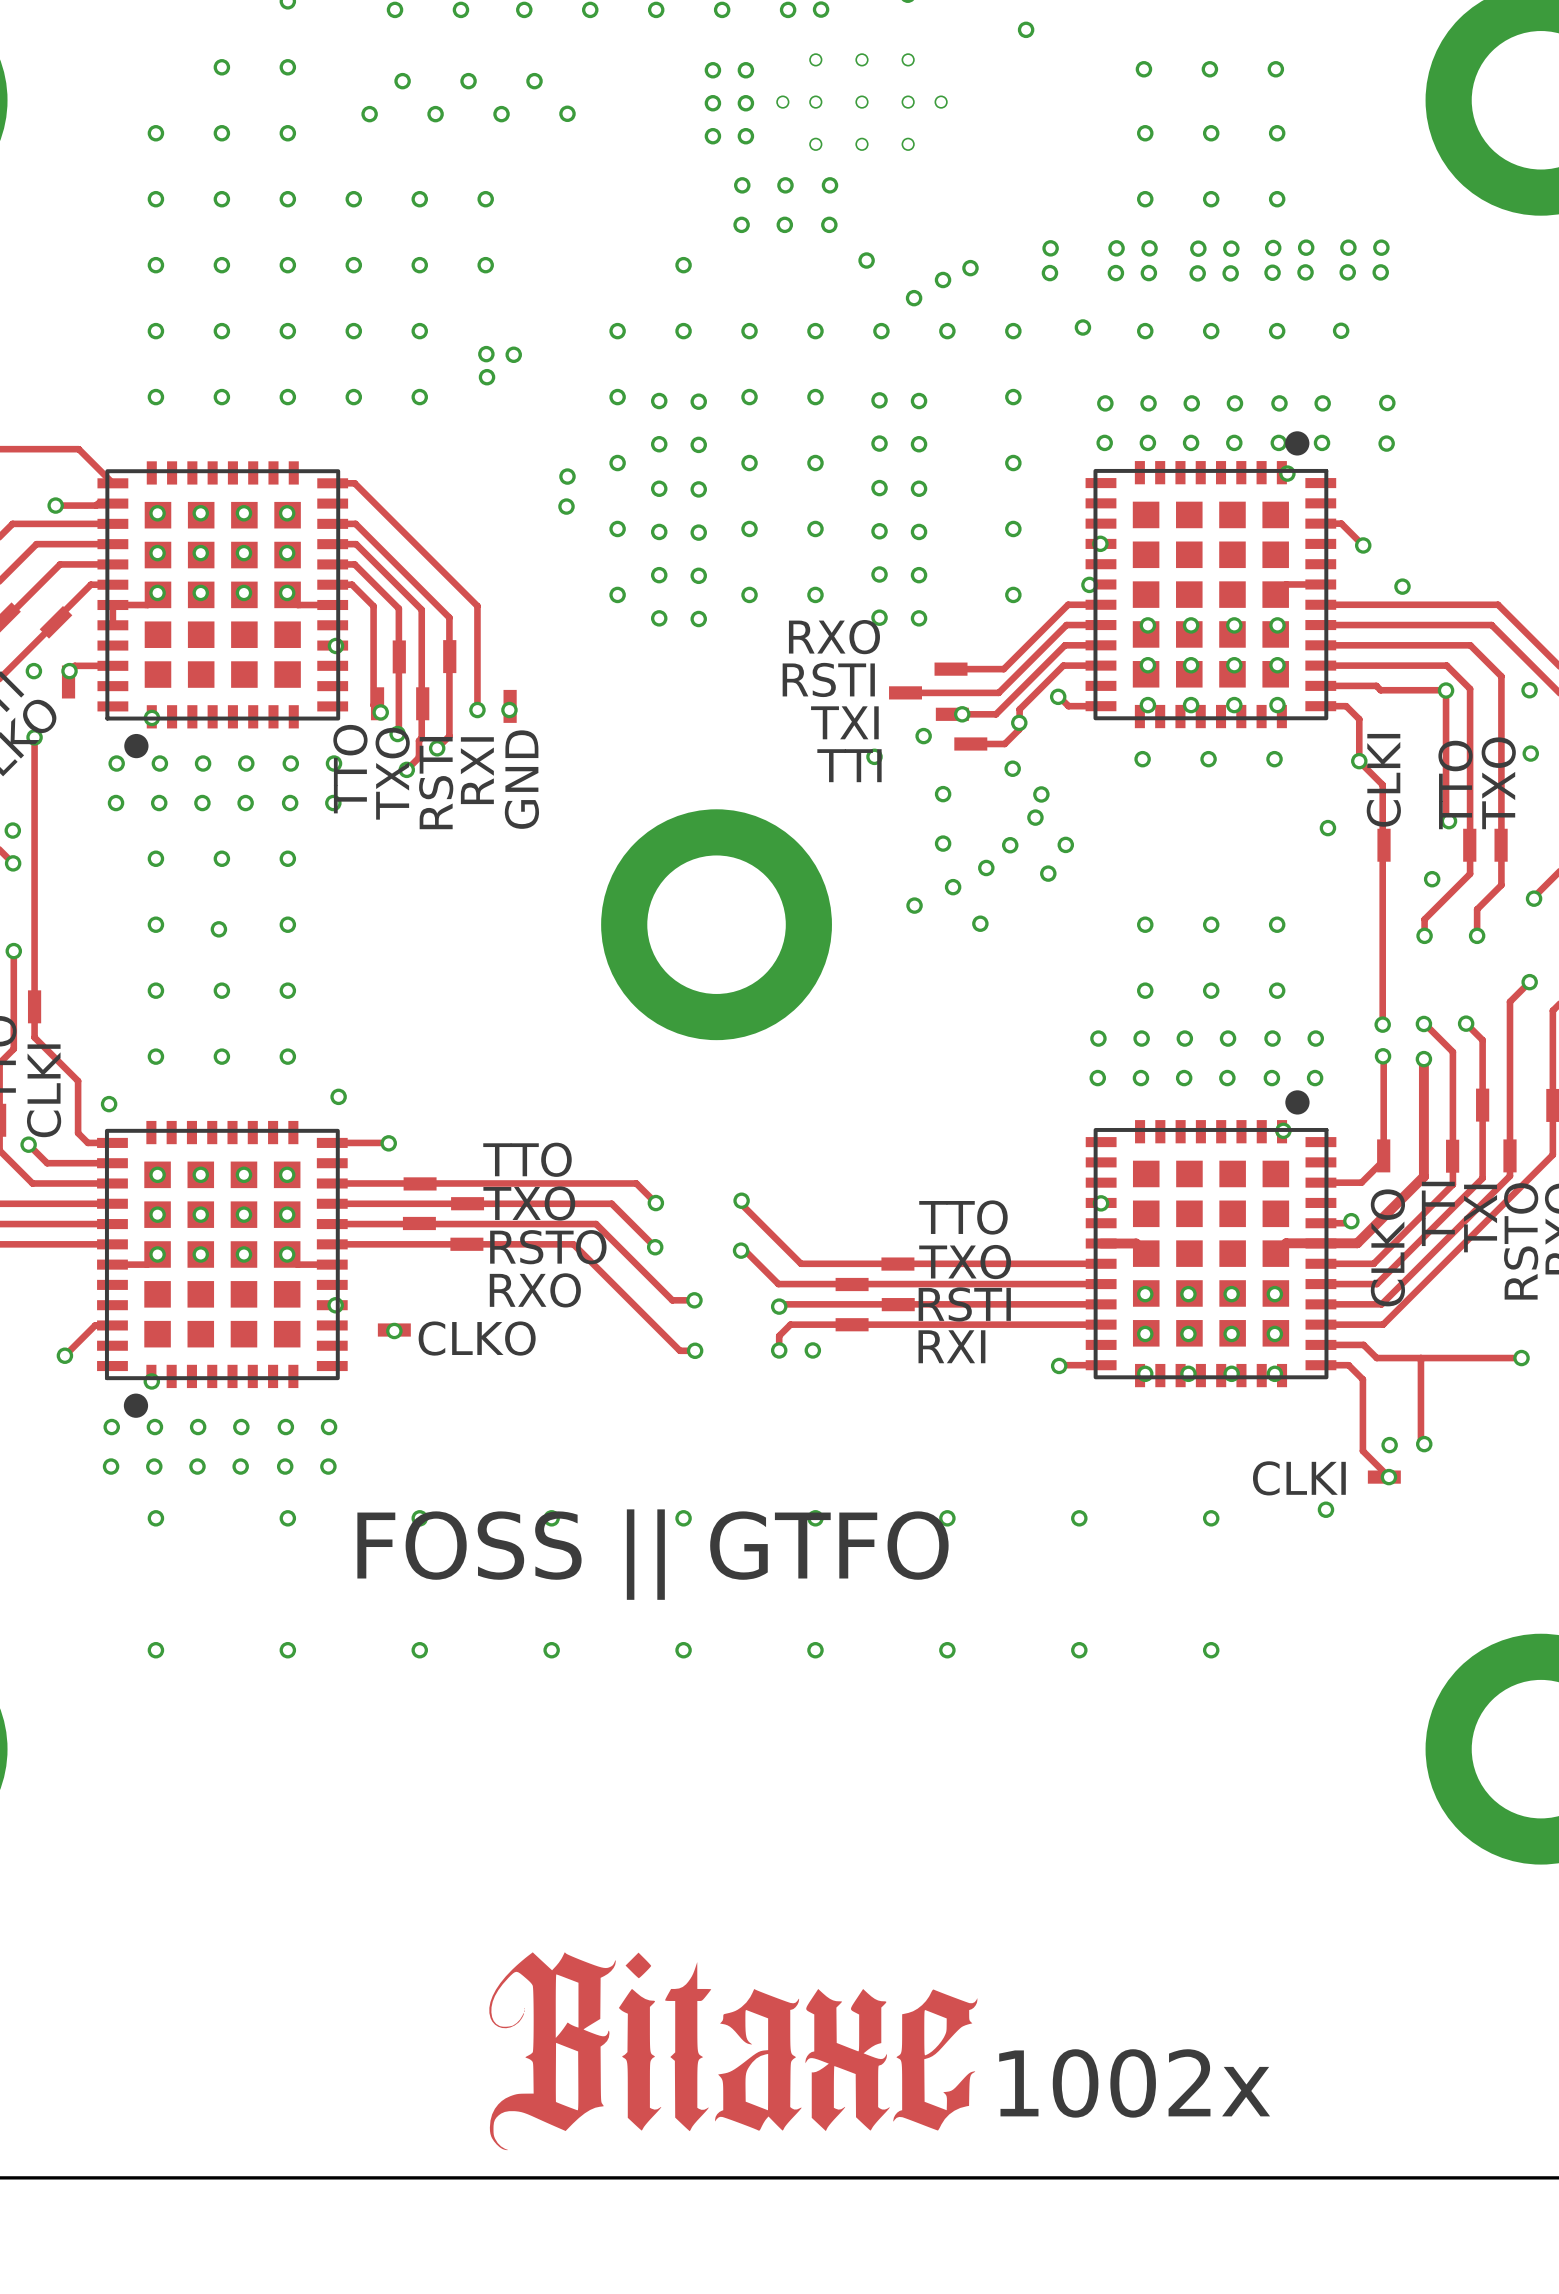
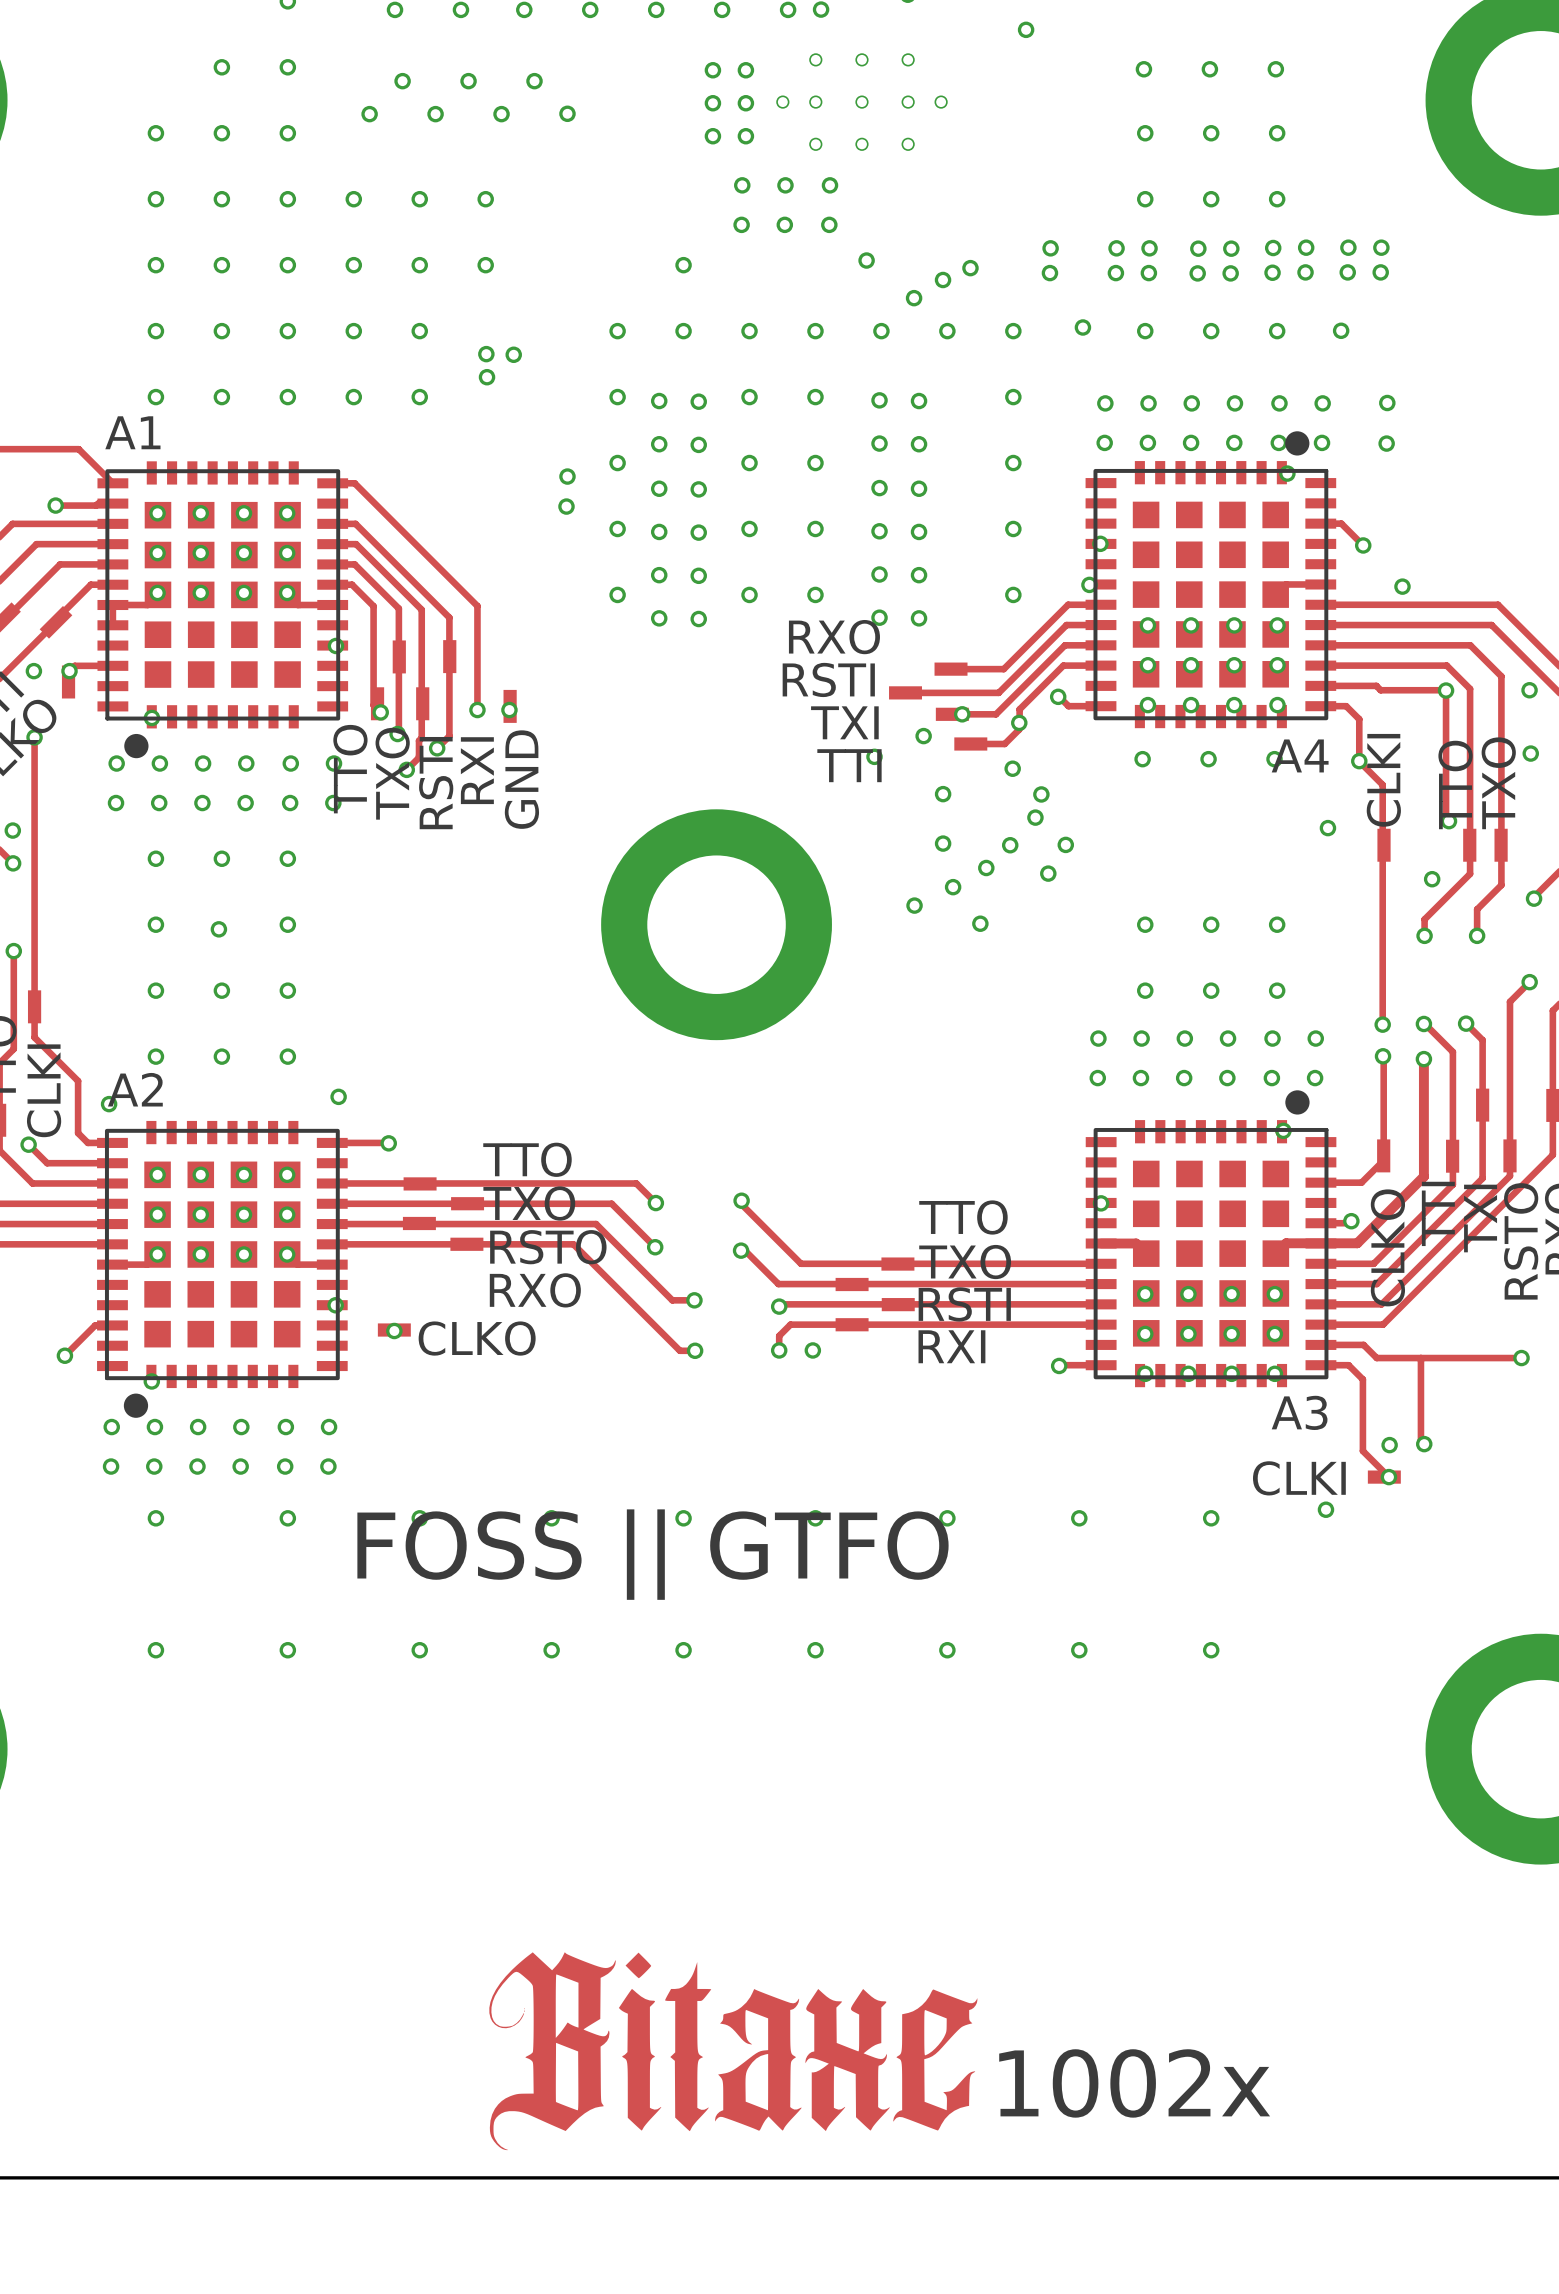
A1 name: none -> A1 (132, 432)
A4 name: none -> A4 (1300, 755)
A2 name: none -> A2 (135, 1089)
A3 name: none -> A3 (1299, 1412)

